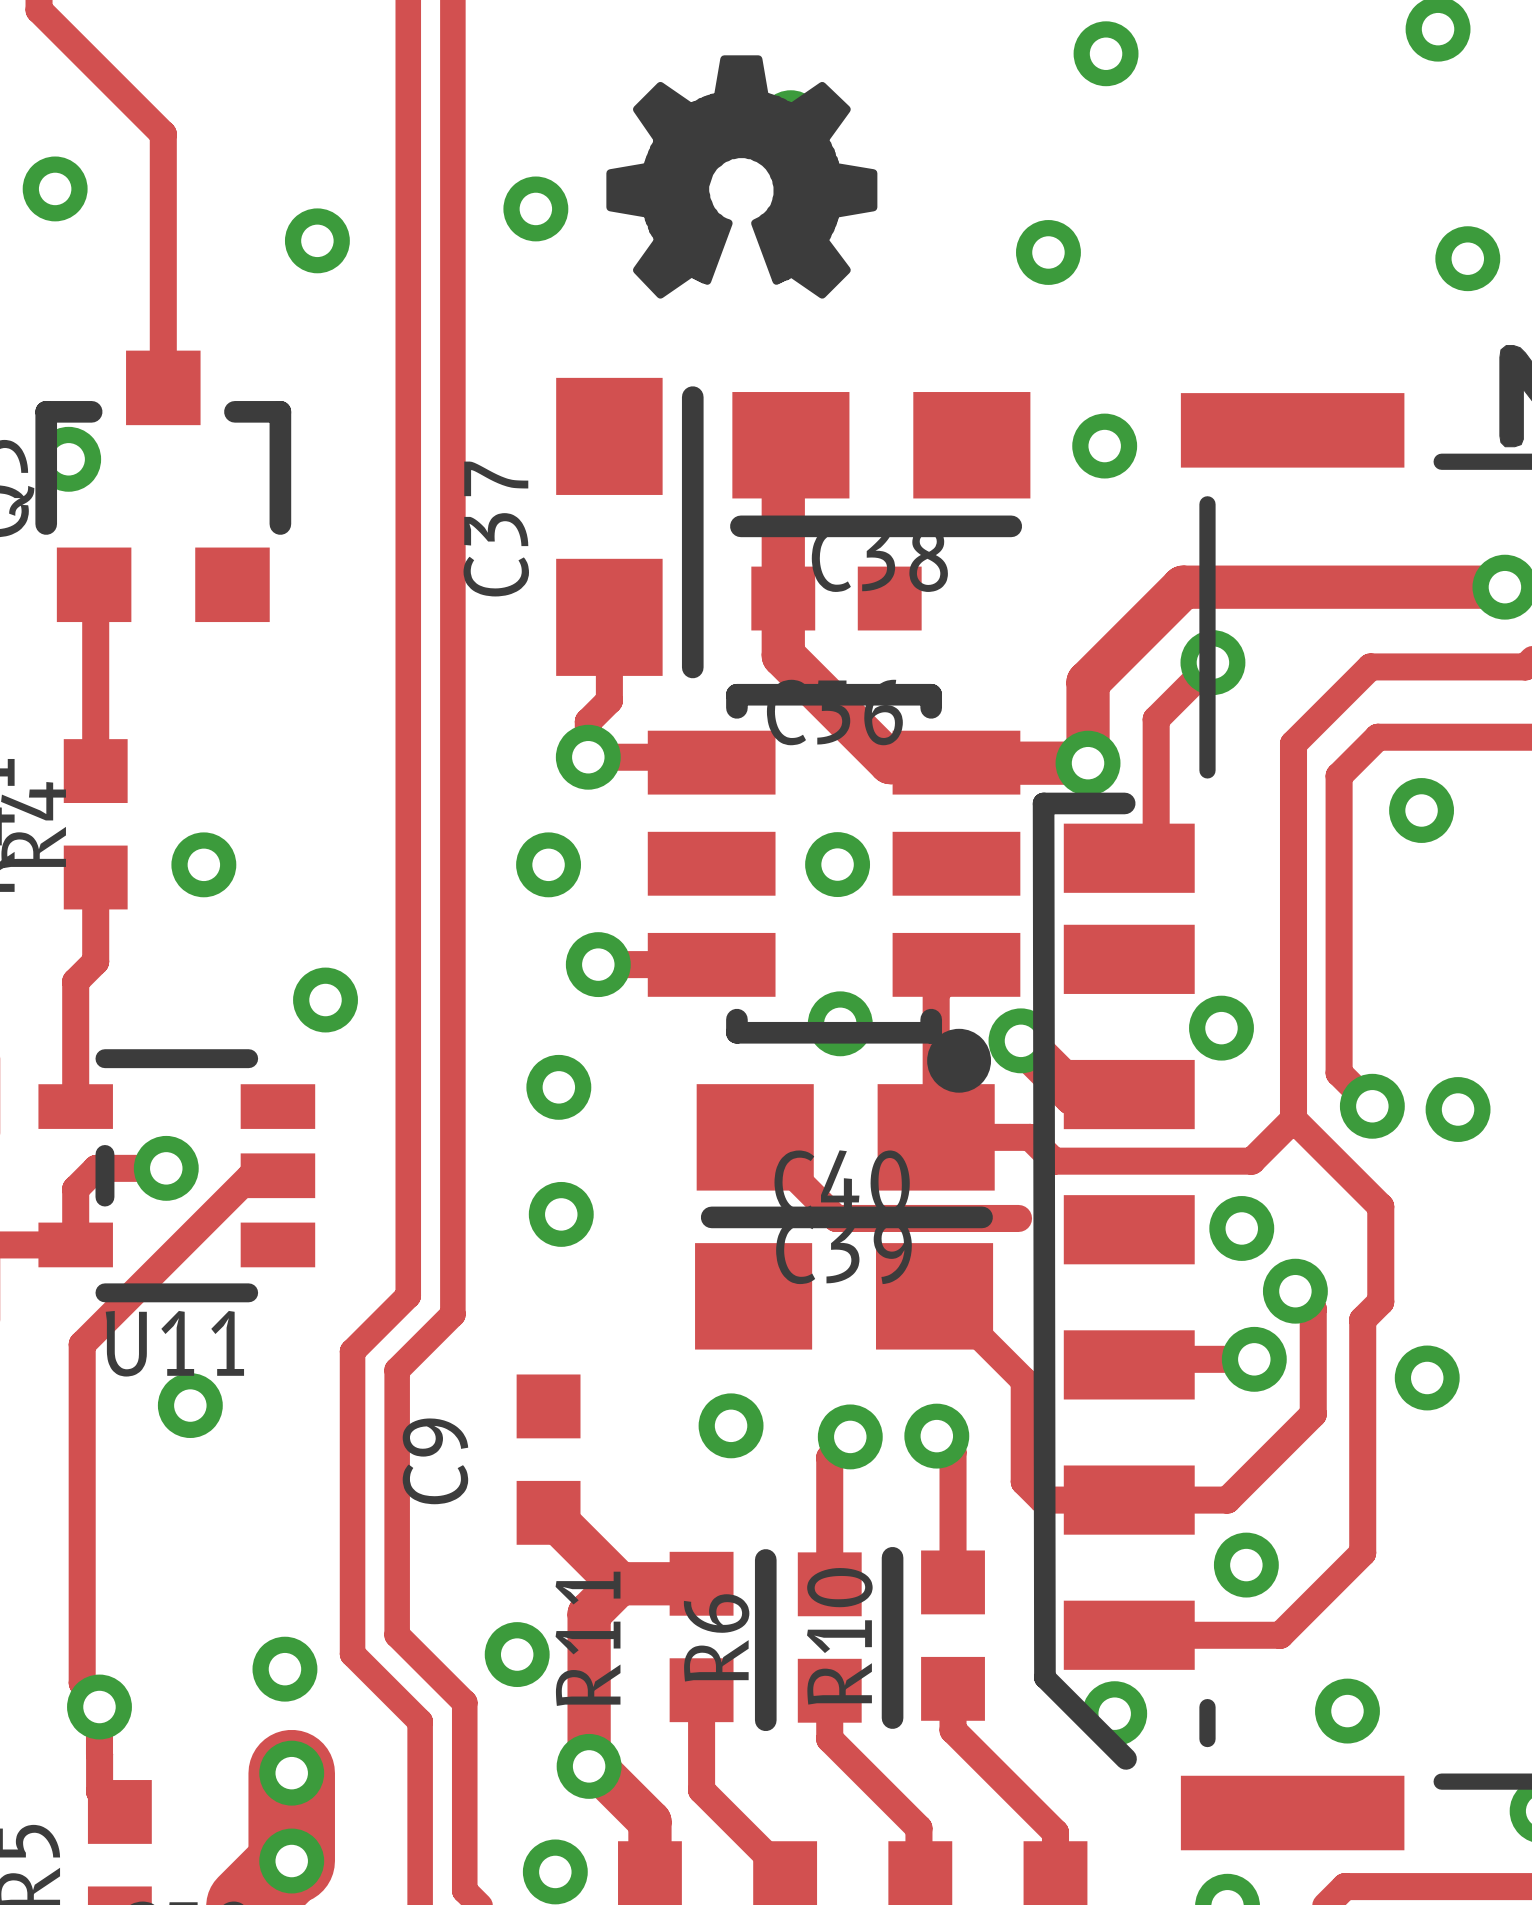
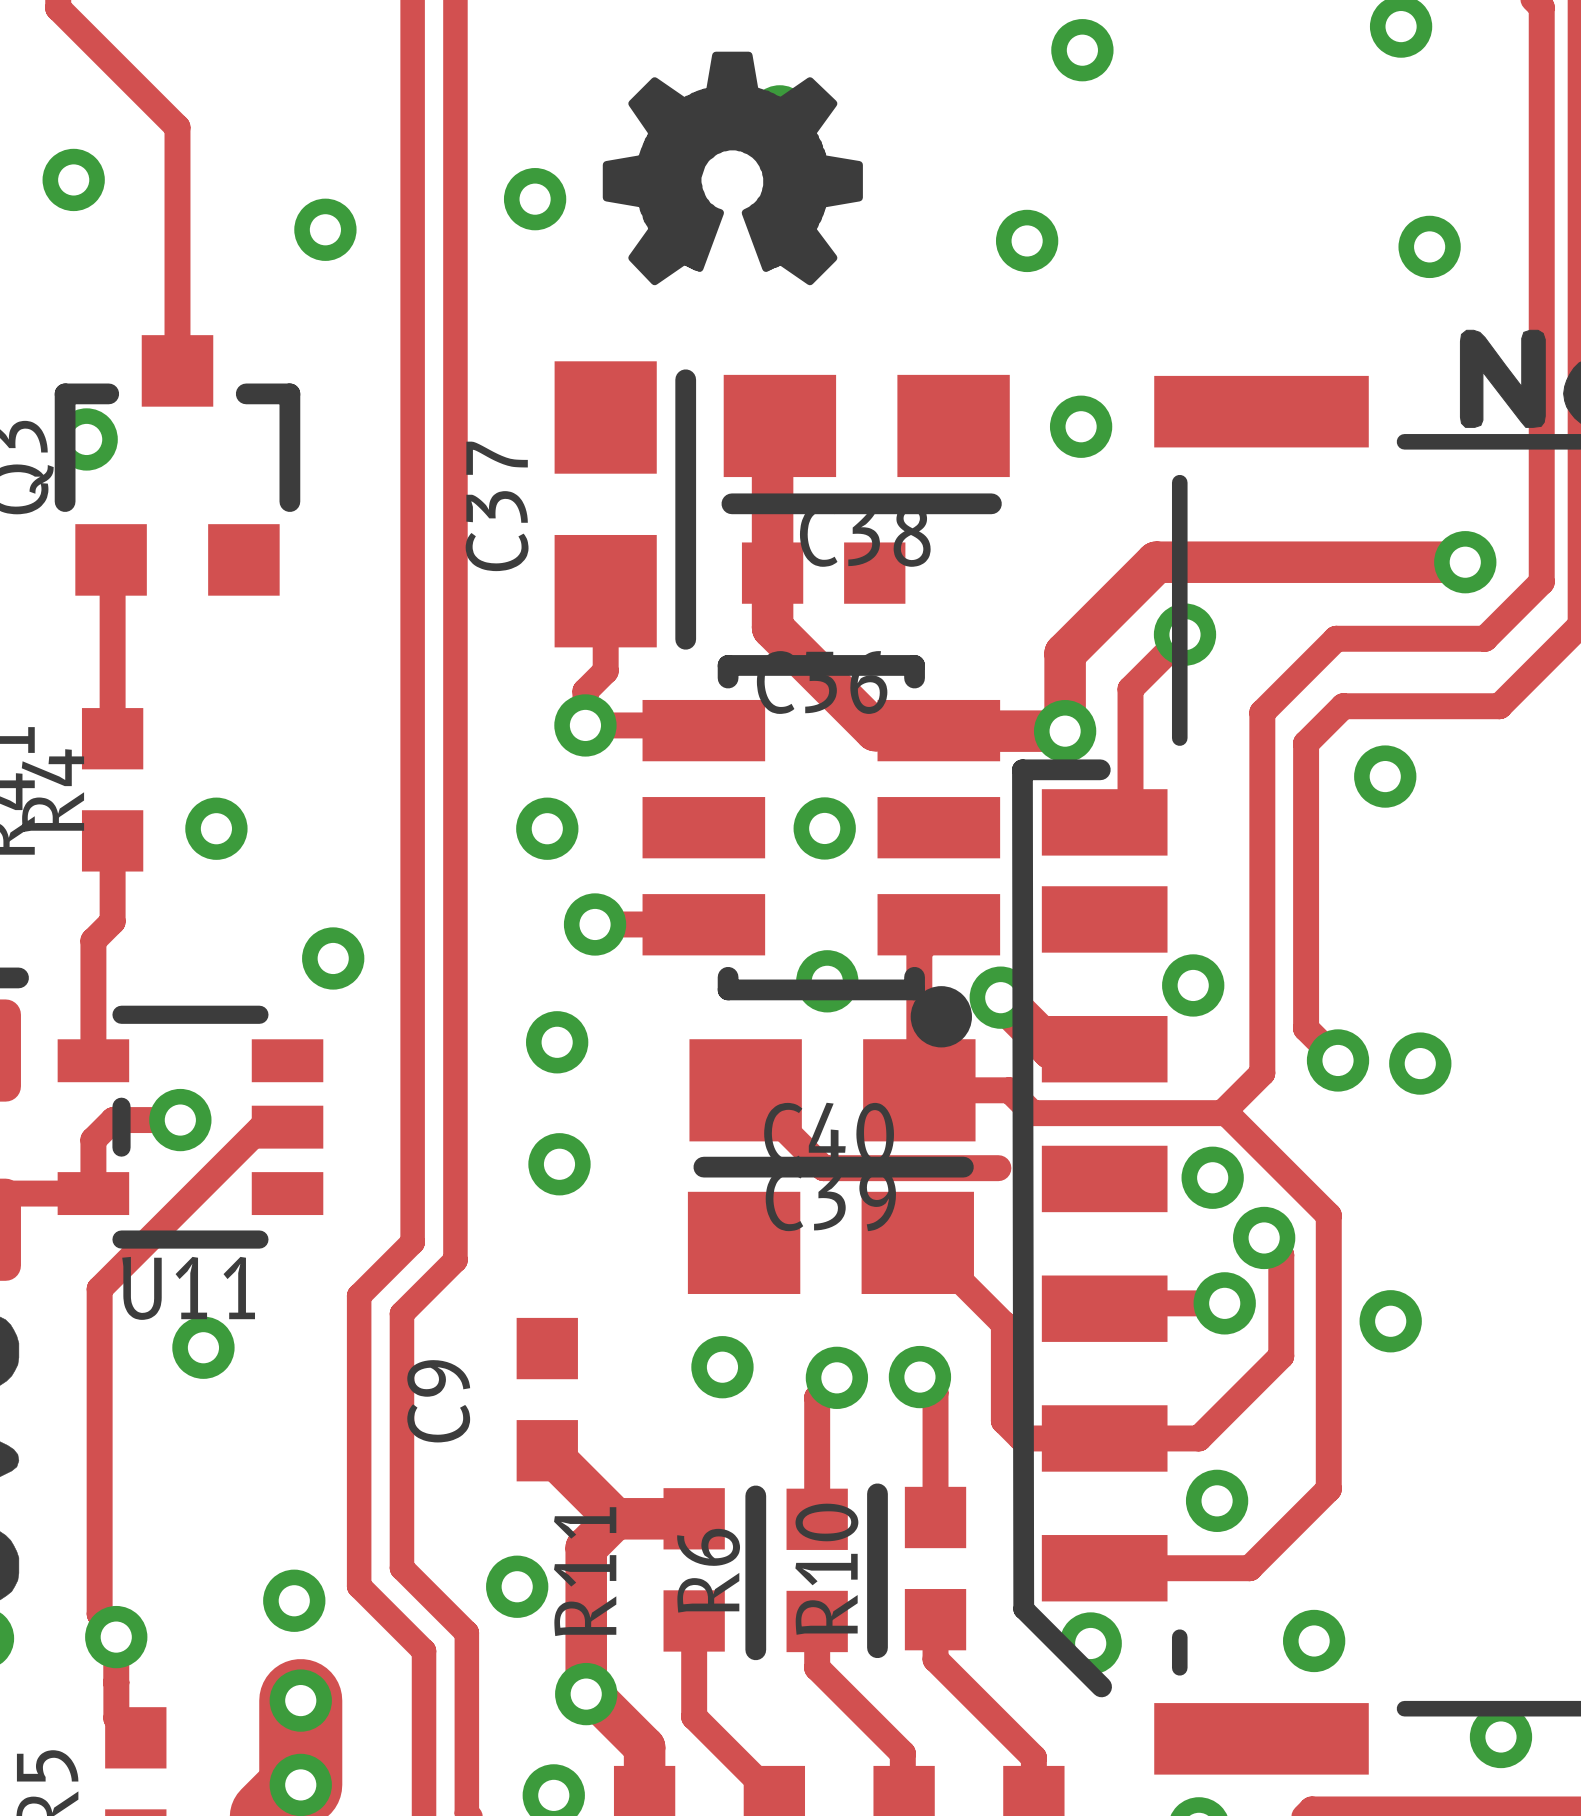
track: (1293, 1119) (1380, 1206) (1380, 1301) (1362, 1319) -> (1224, 1111) (1328, 1215) (1328, 1265)

